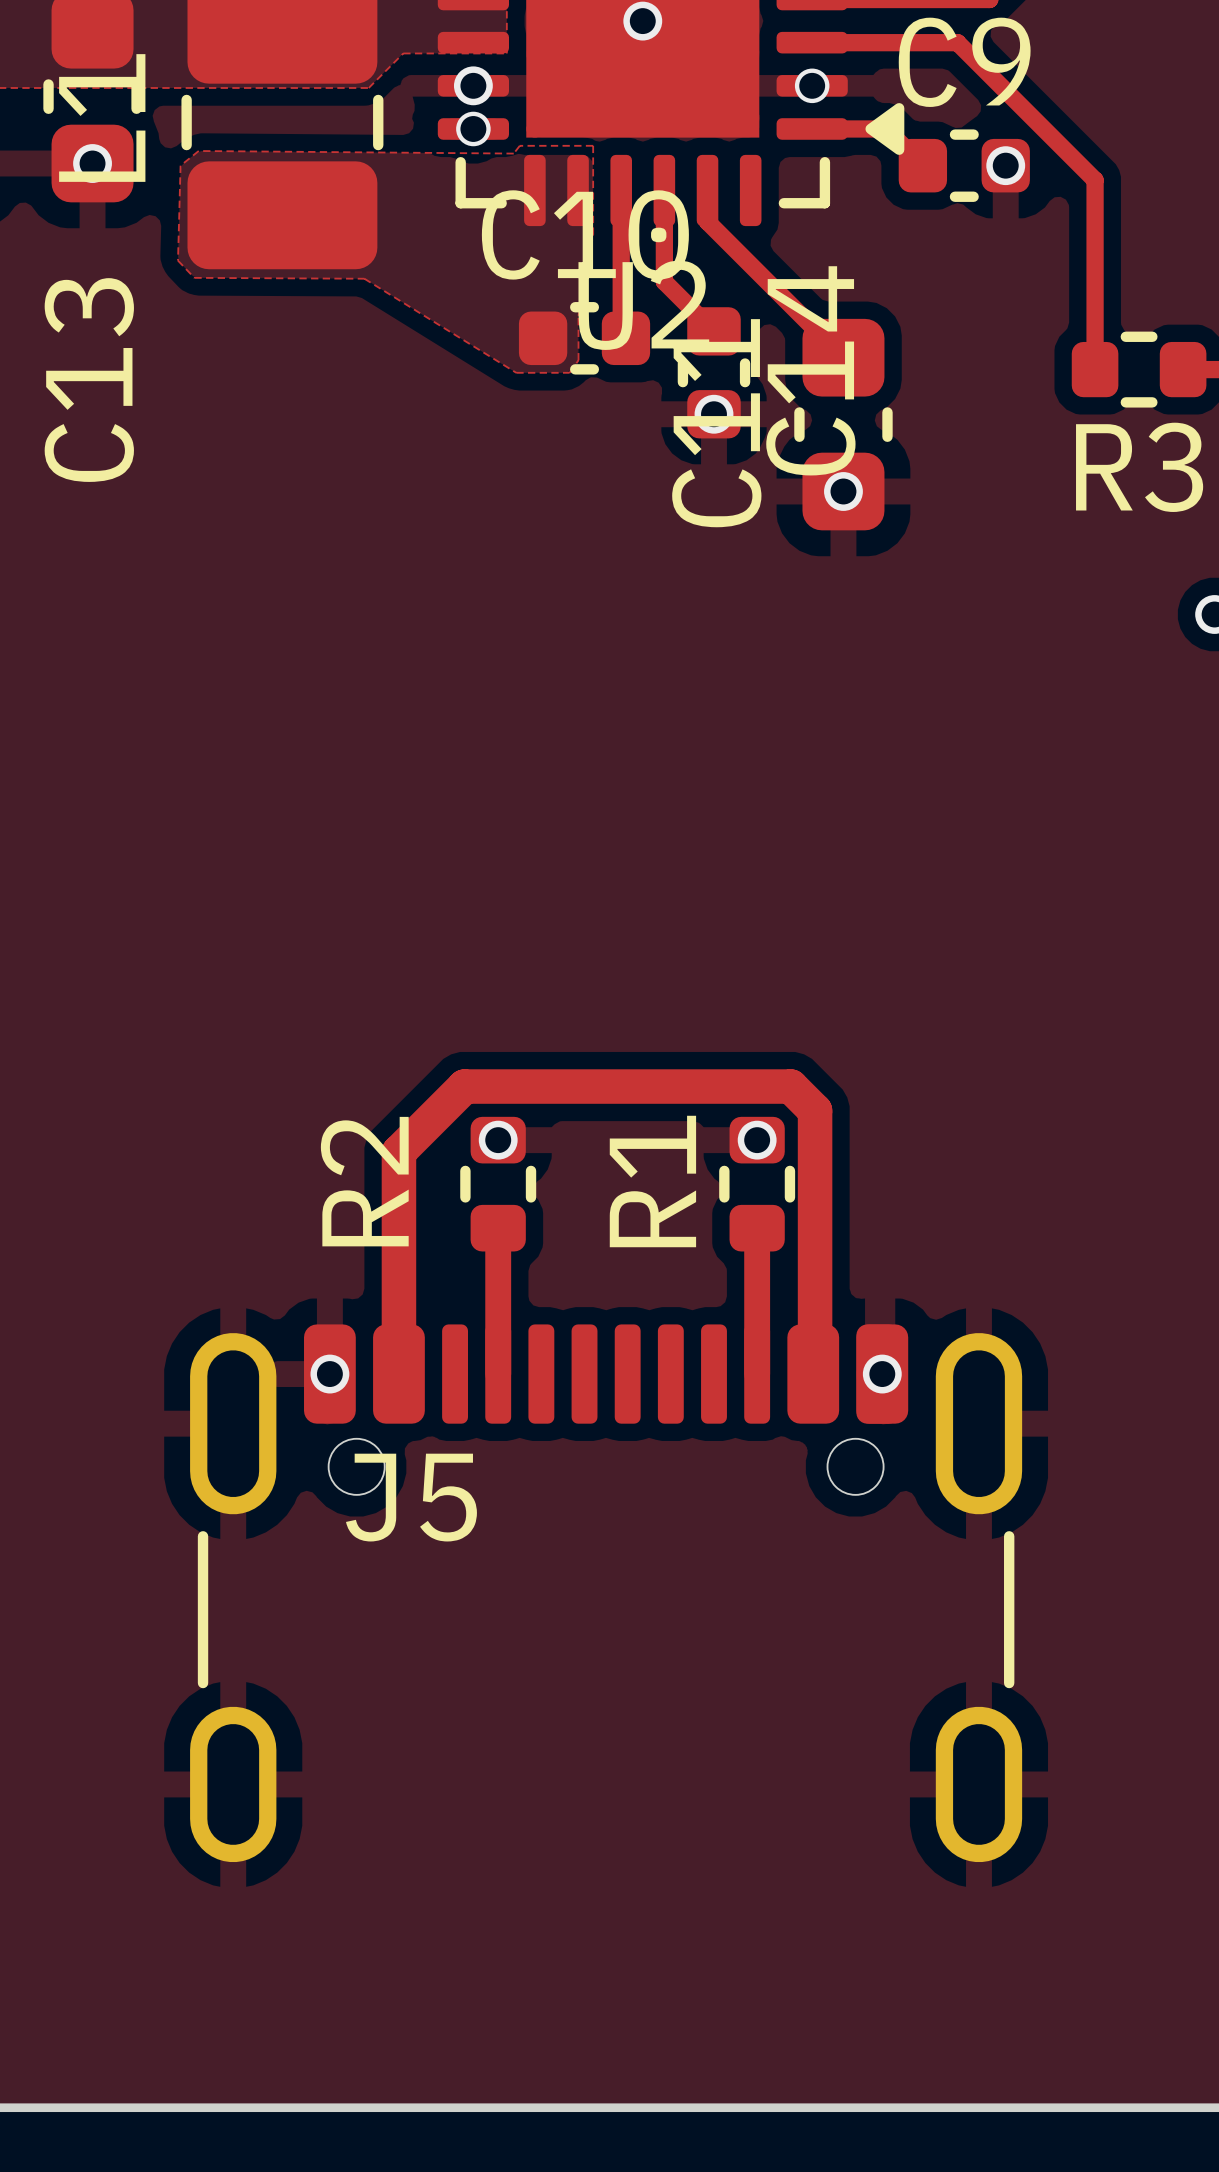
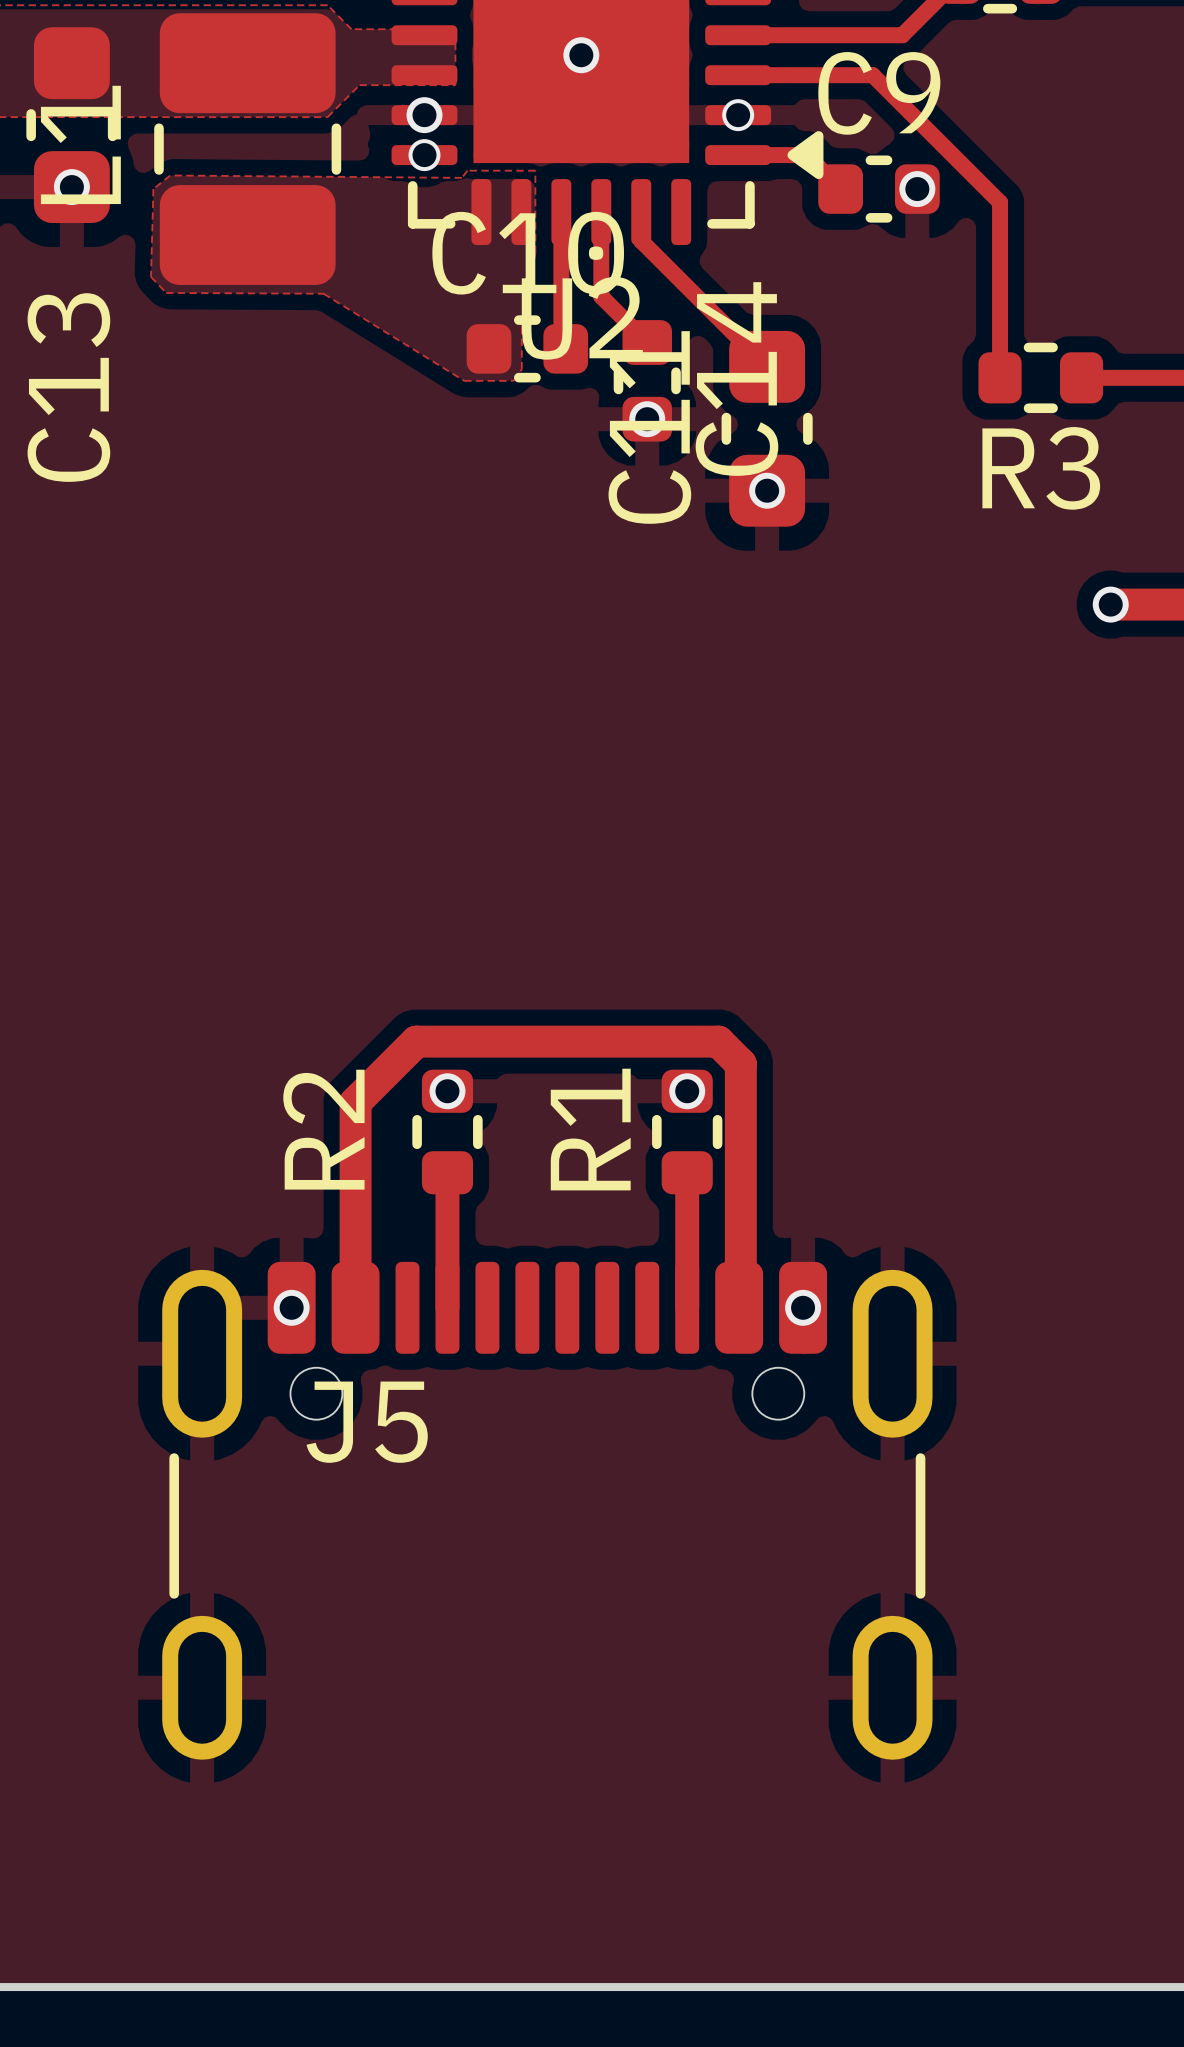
J5 footprint: [190, 1324, 1023, 1863] -> [162, 1261, 933, 1760]

